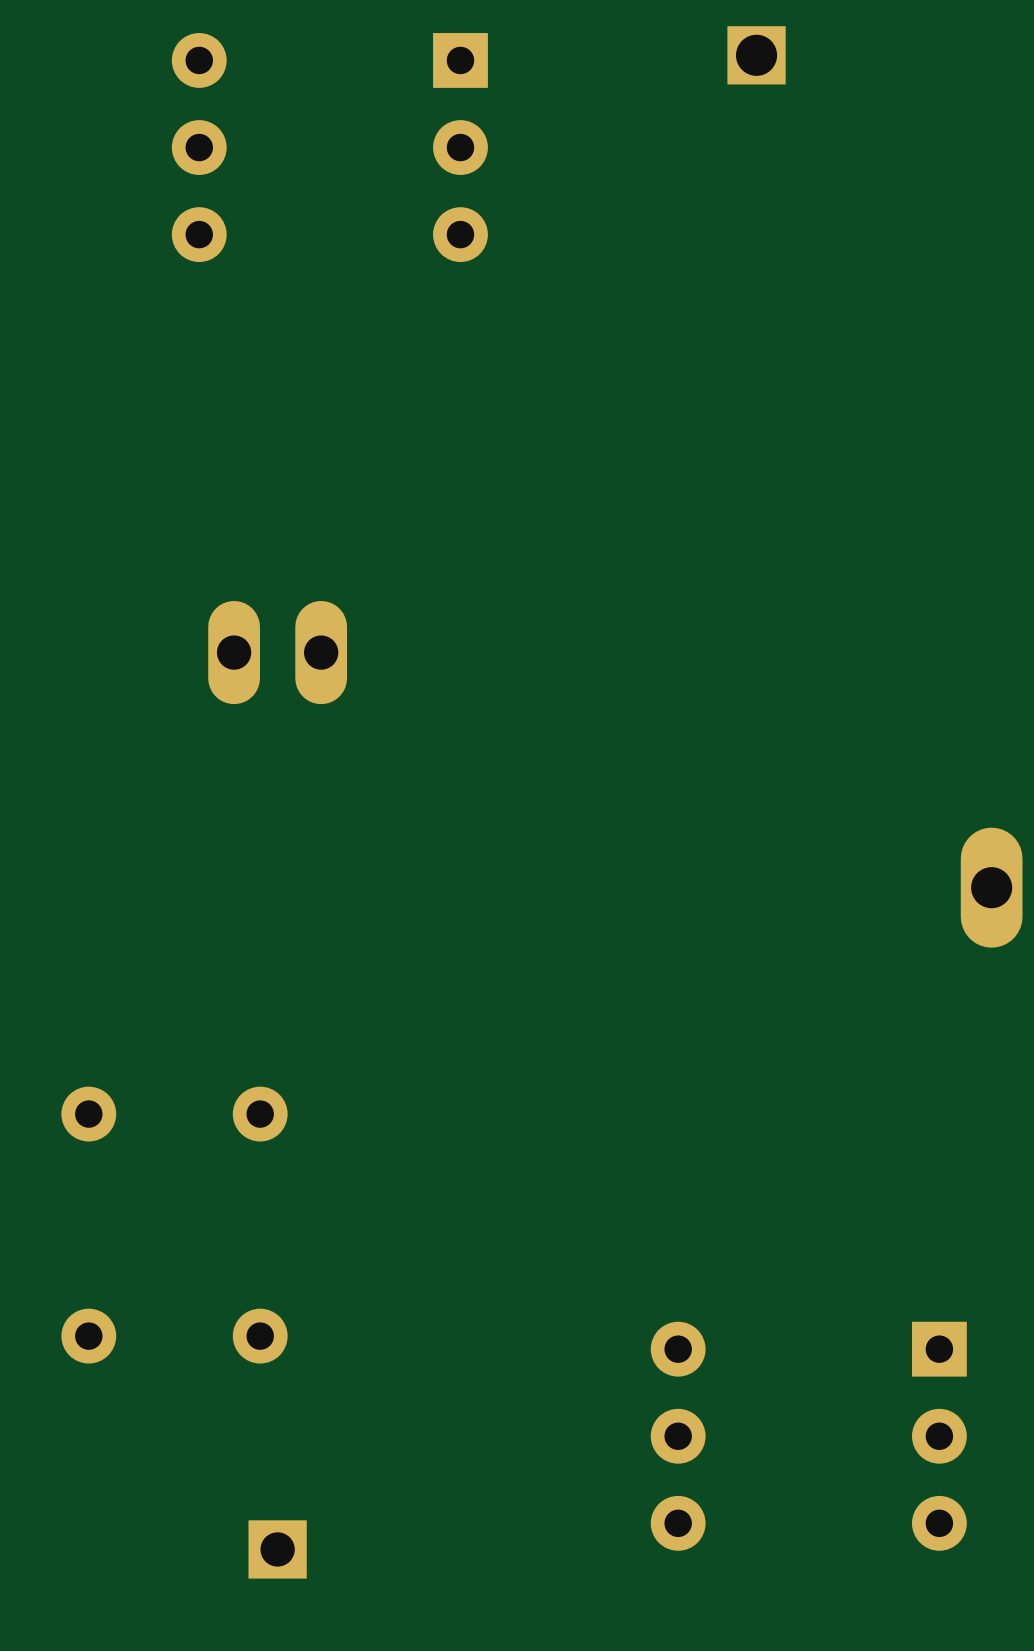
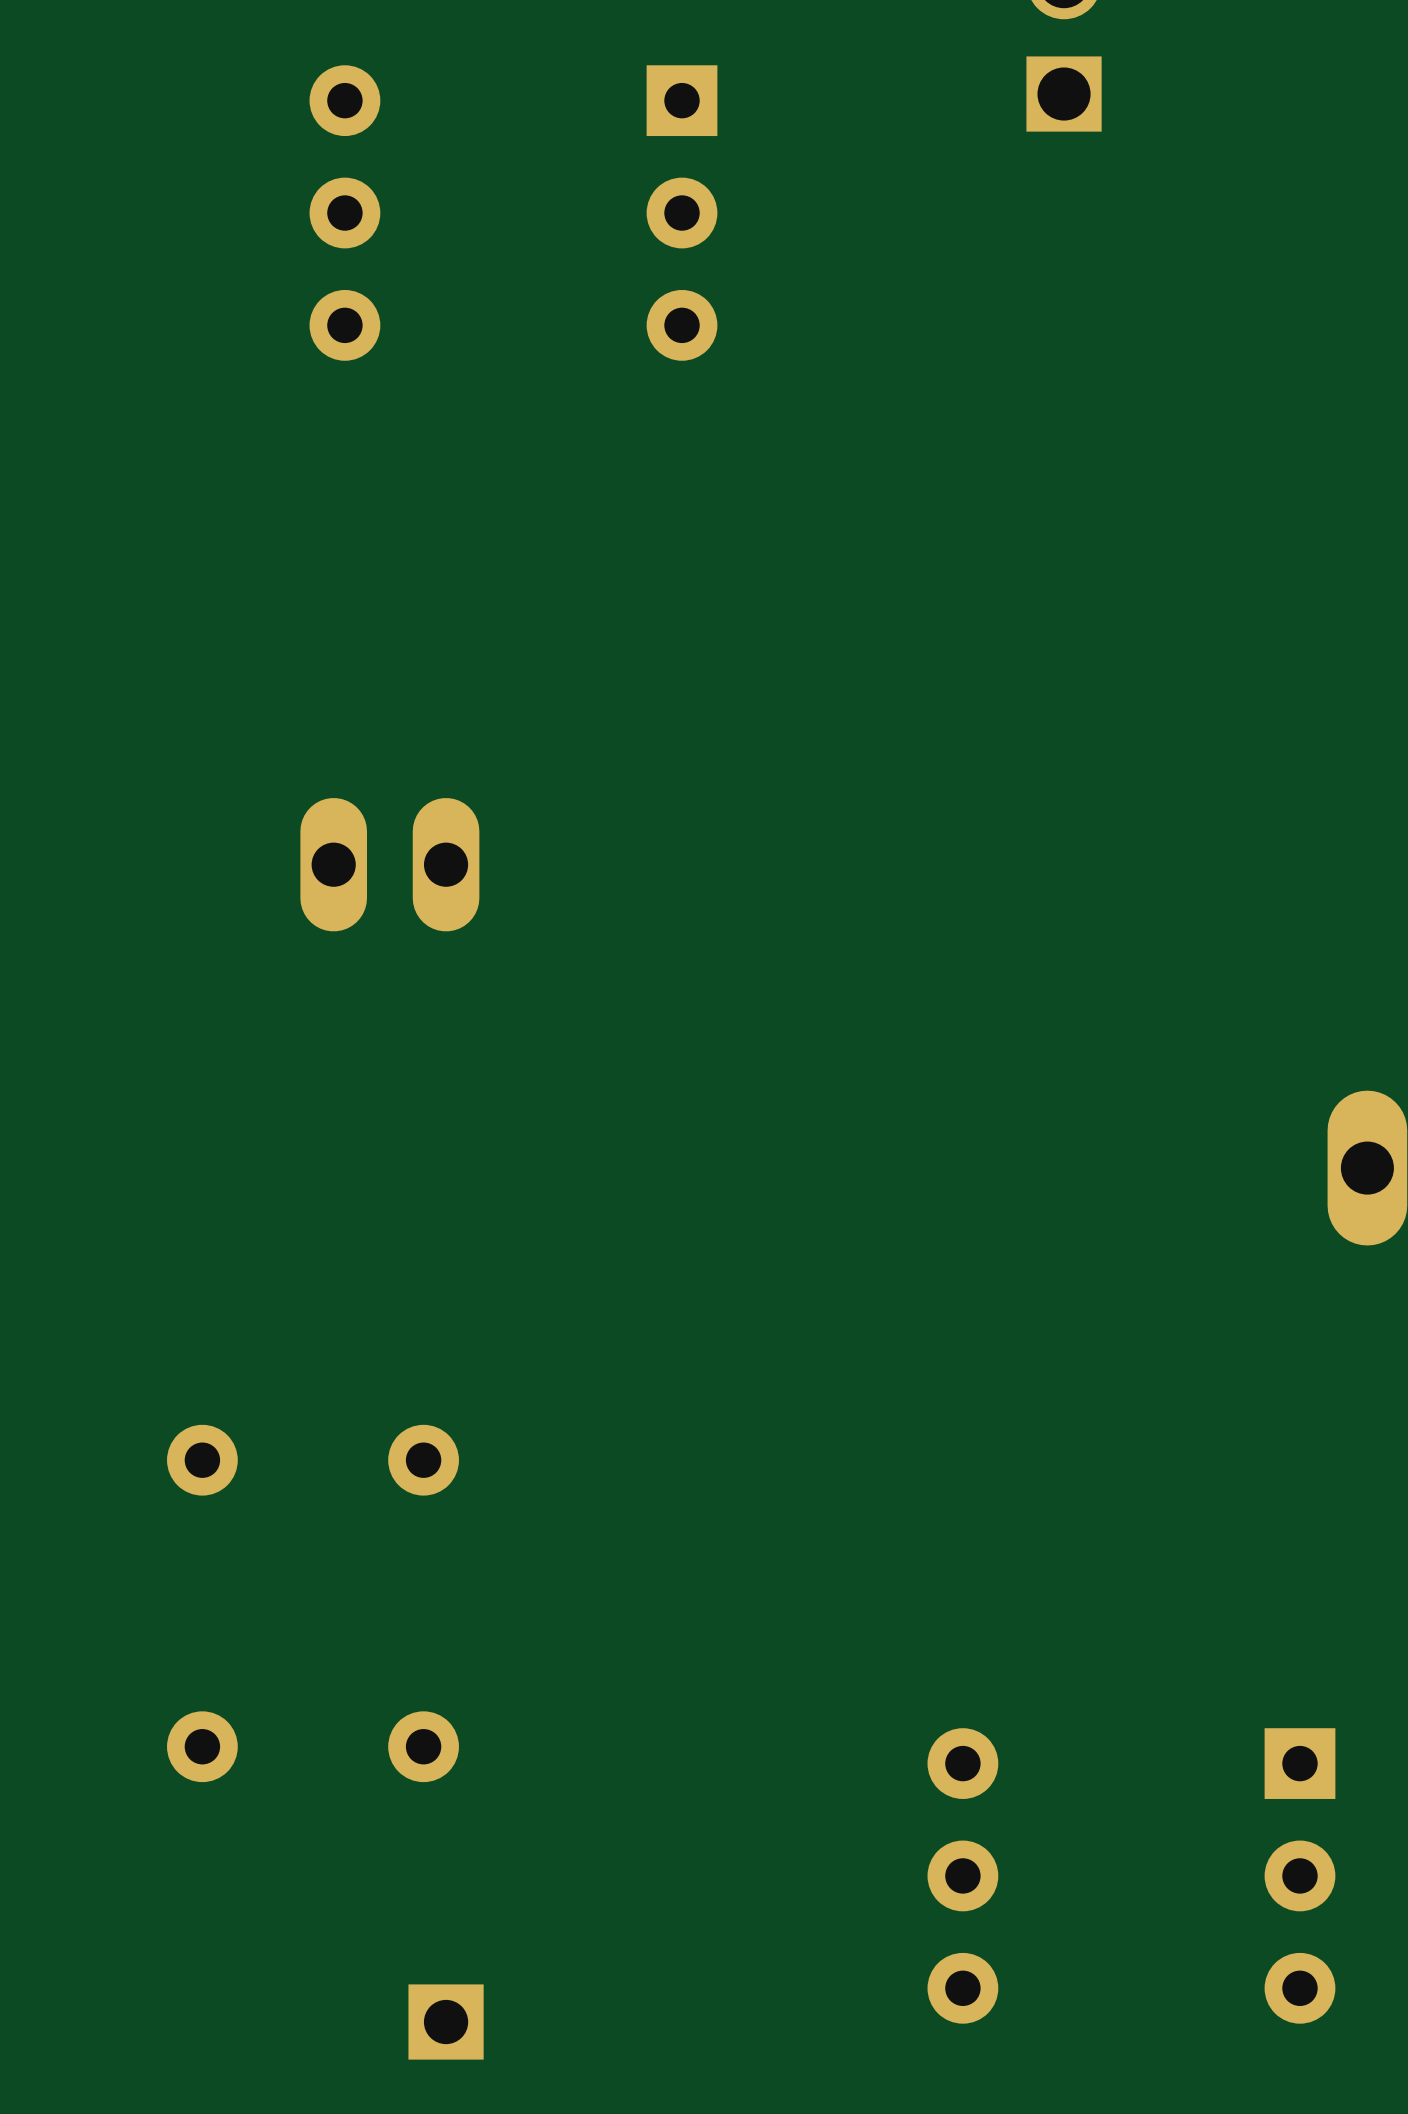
part position: (277, 652) -> (389, 864)

